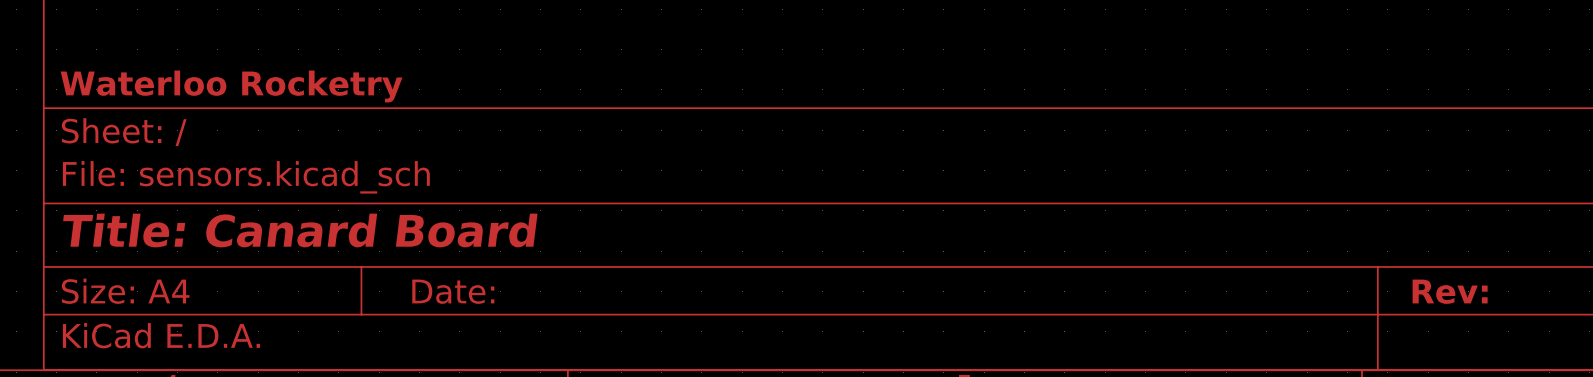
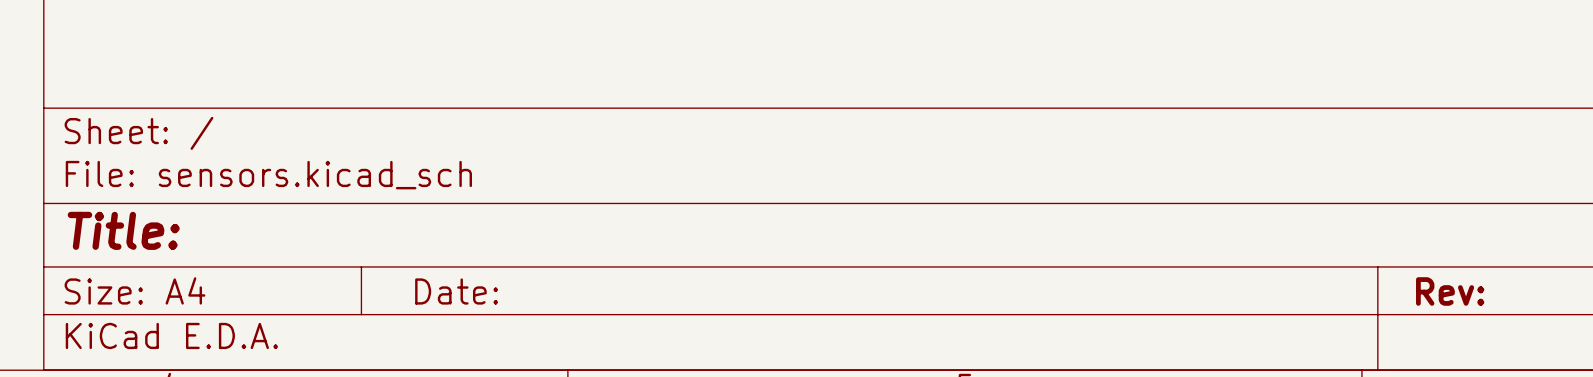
title block: Waterloo Rocketry (231, 86) -> none
title block: Title: Canard Board (300, 230) -> Title: (123, 230)

